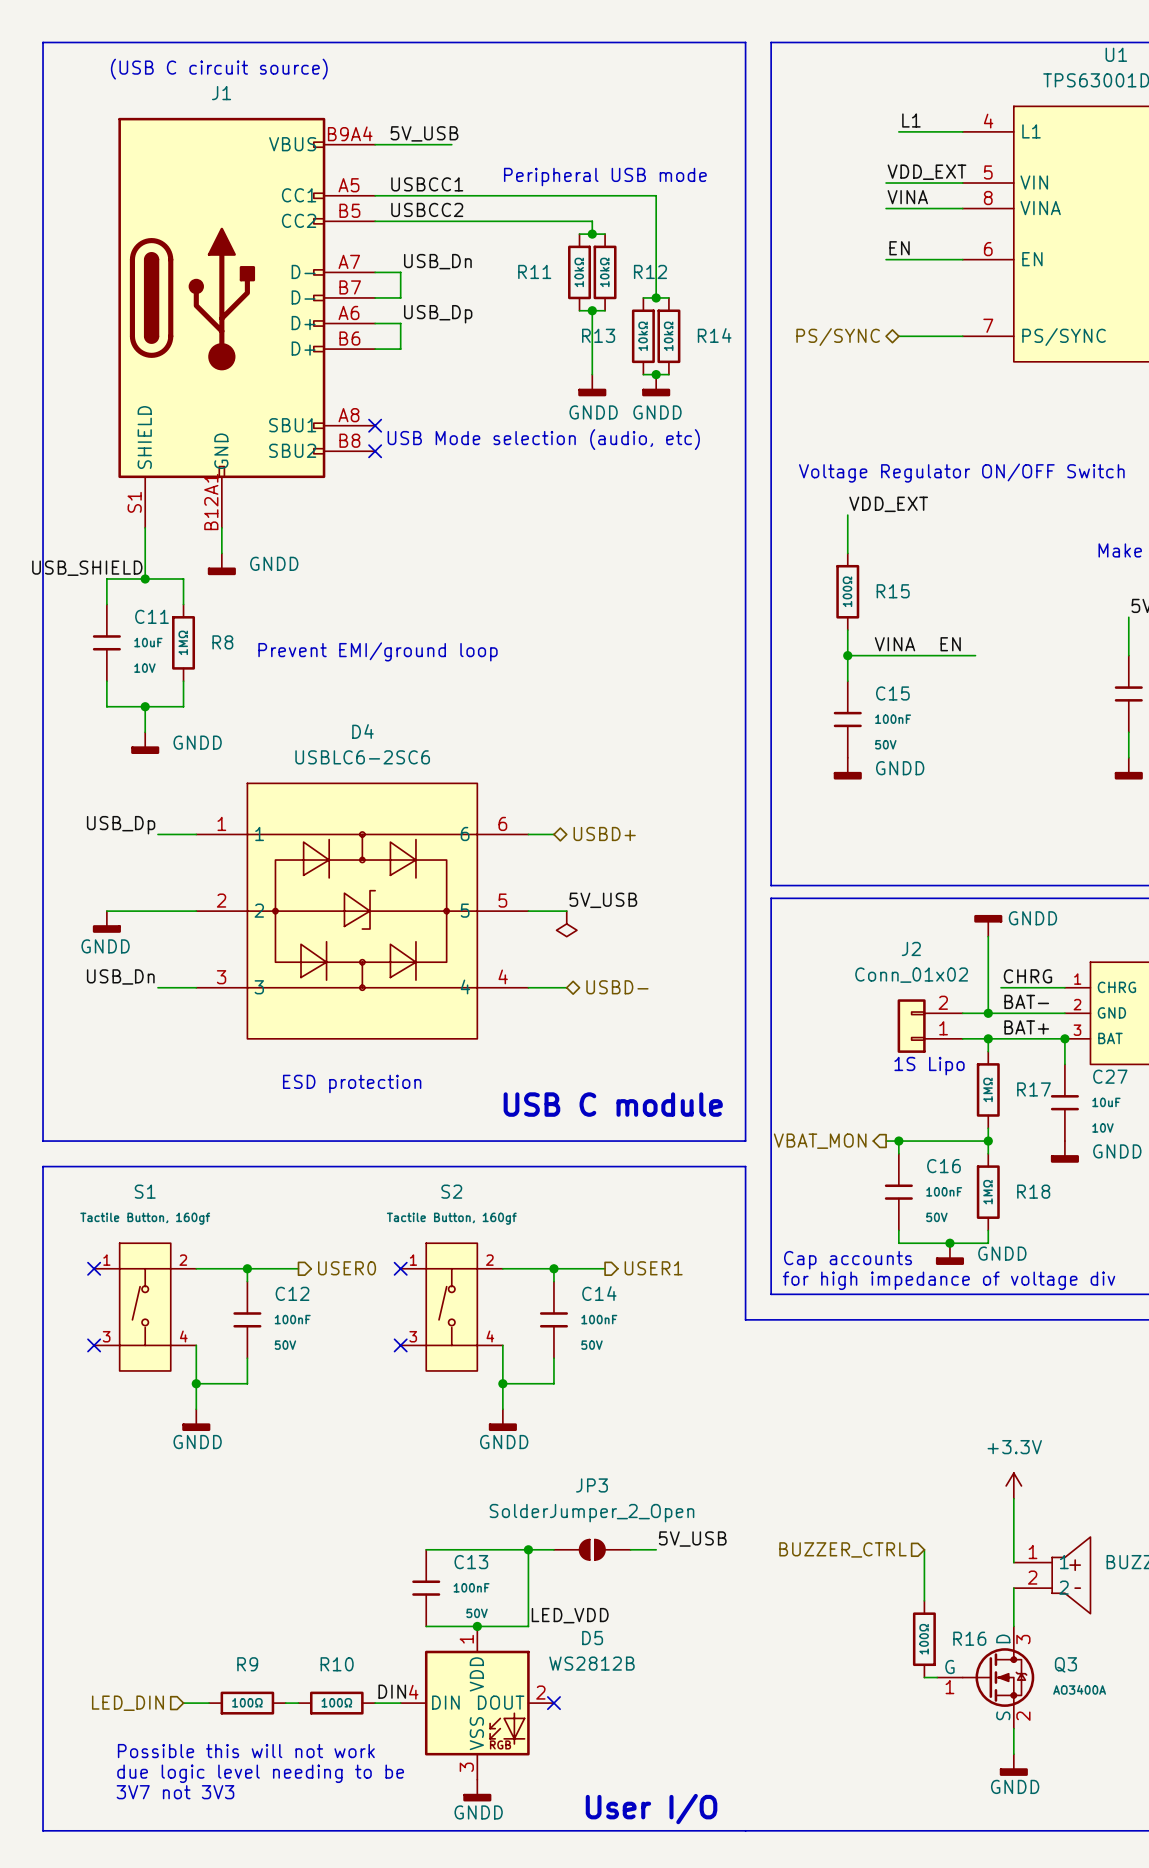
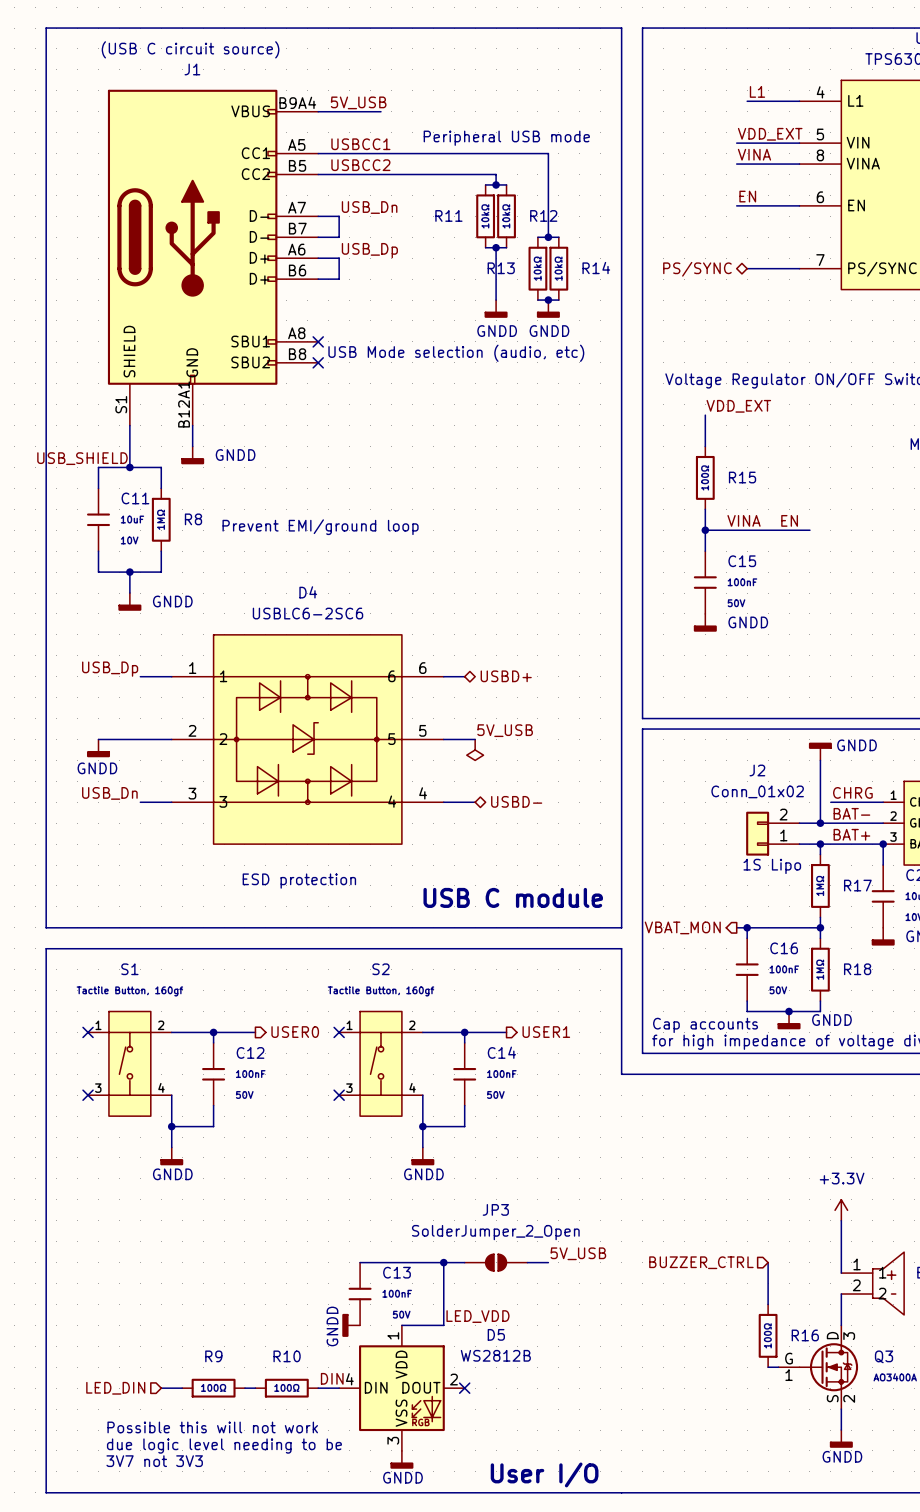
power symbol: none -> GNDD (351, 1325)
wire: (426, 1626) (477, 1626) -> none
junction: (477, 1626) -> none

